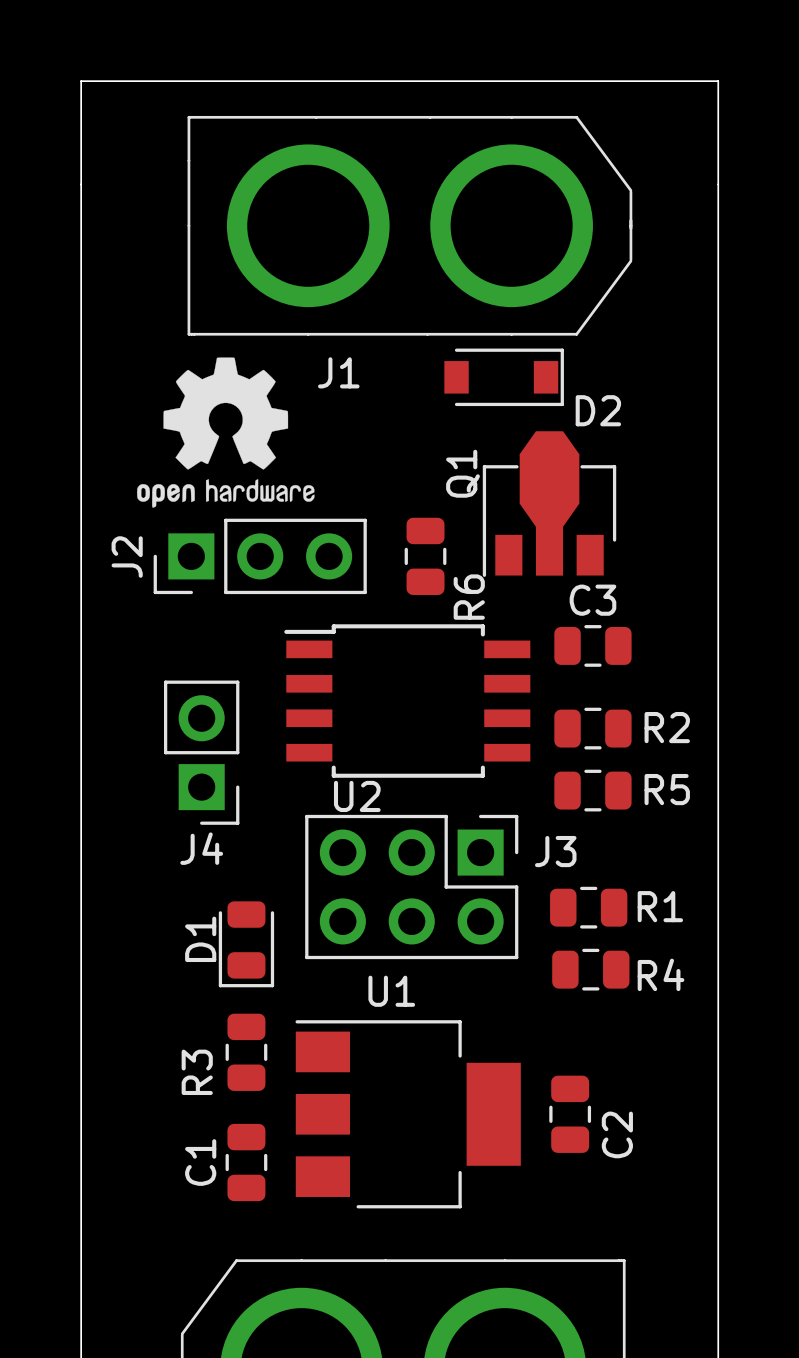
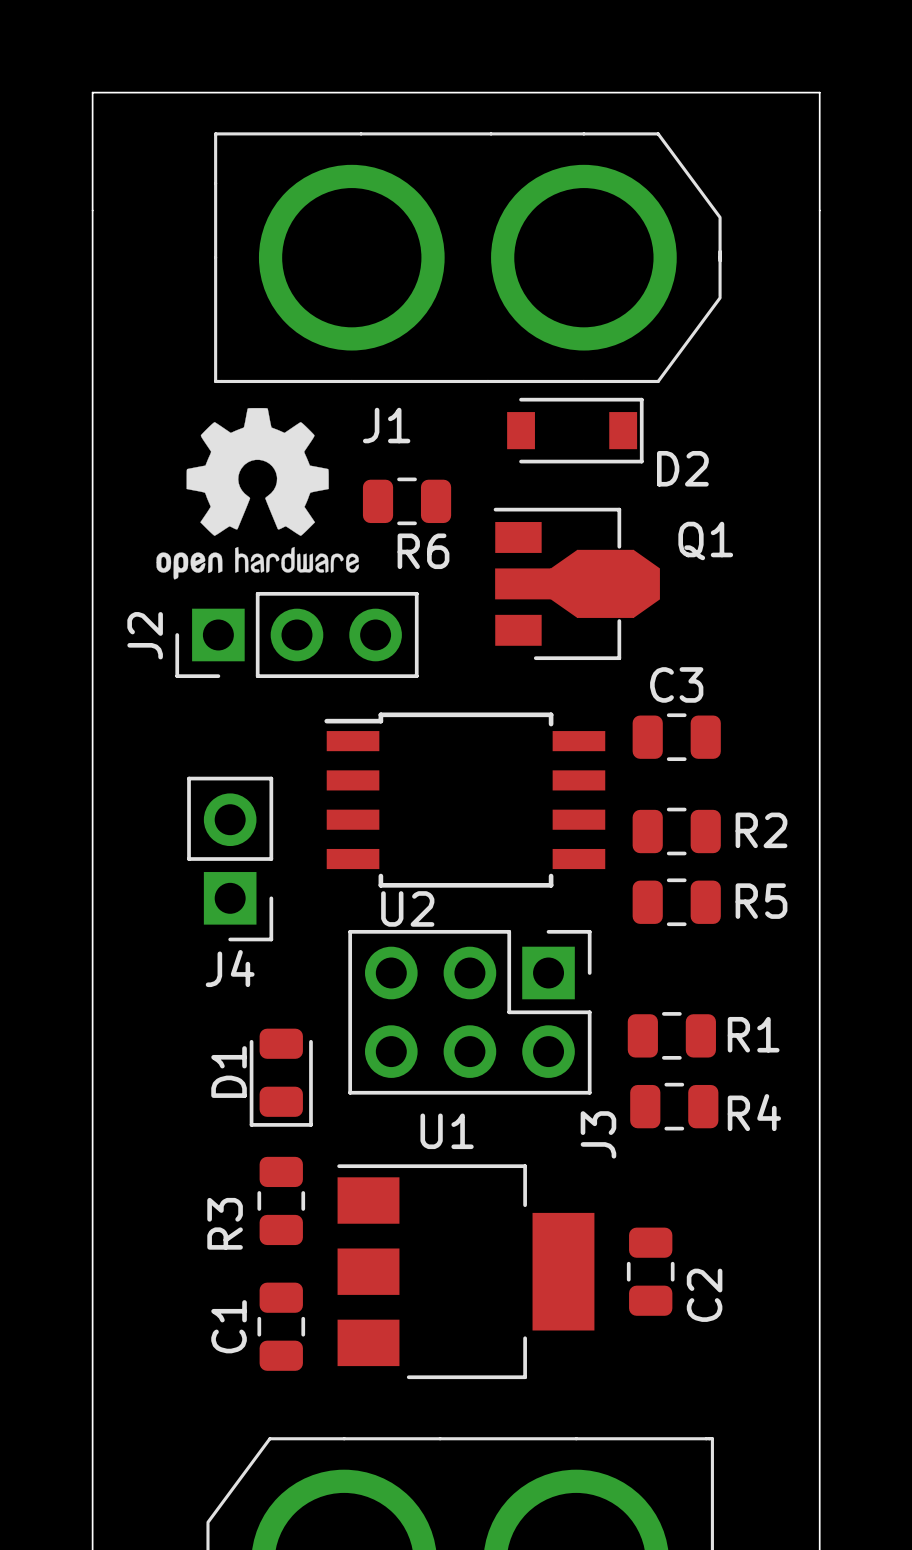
Q1 name position: Q1 (463, 473) -> Q1 (705, 540)
Q1 rotation: 0° (549, 504) -> 90° clockwise (576, 583)
R6 rotation: 0° (425, 556) -> 90° clockwise (407, 501)
R6 position: (425, 556) -> (407, 501)
J3 name rotation: 0° (555, 851) -> 90° counterclockwise (598, 1134)
J3 name position: J3 (555, 851) -> J3 (598, 1134)

